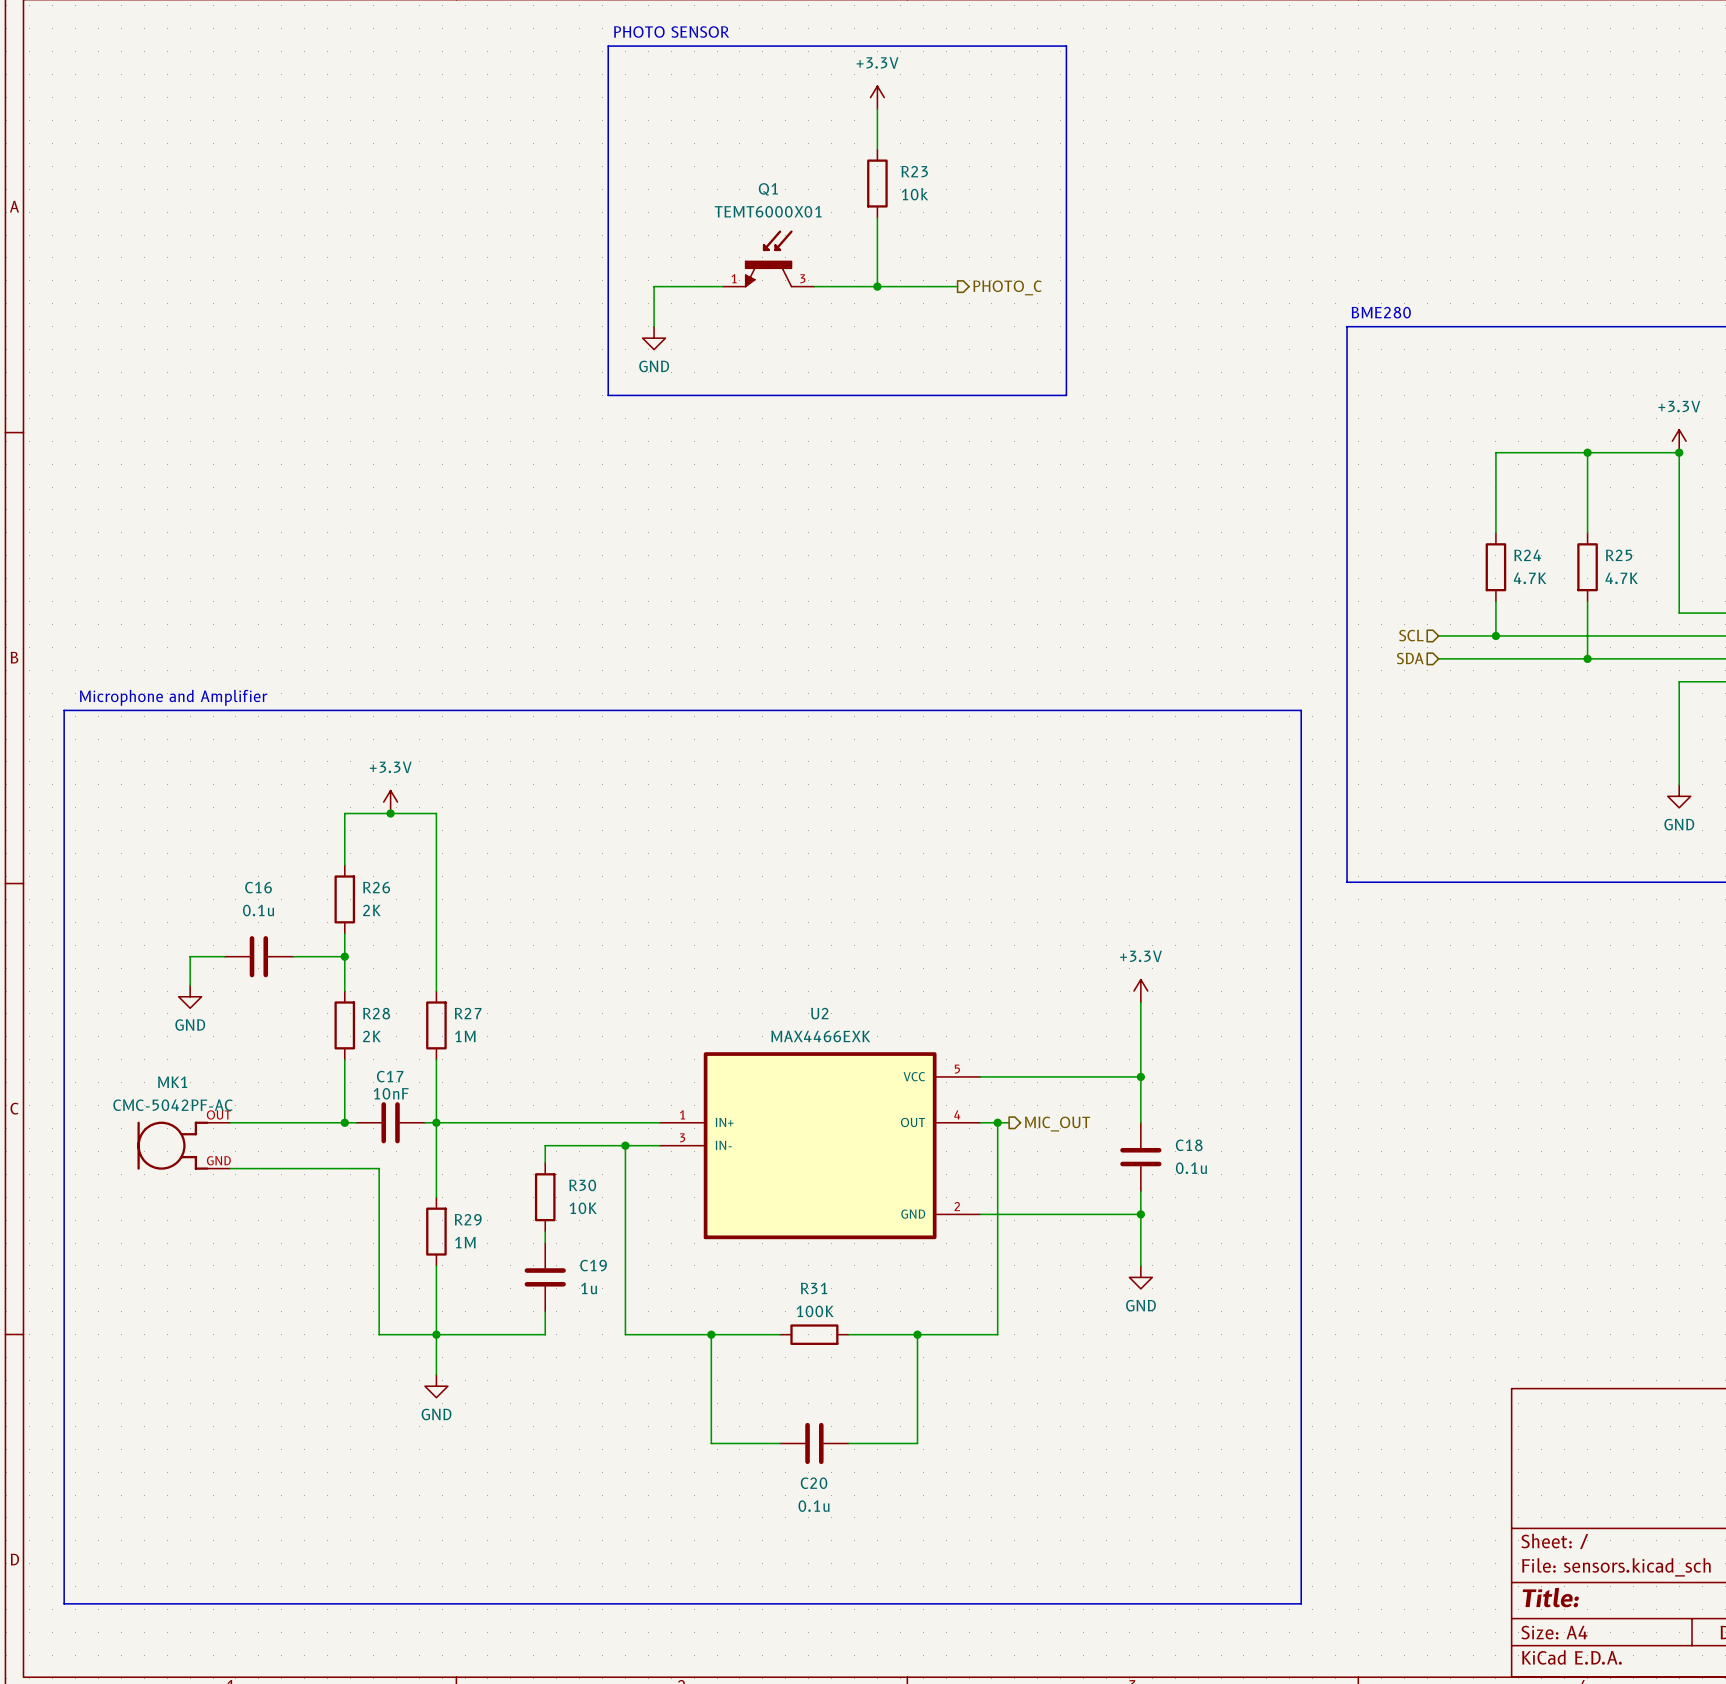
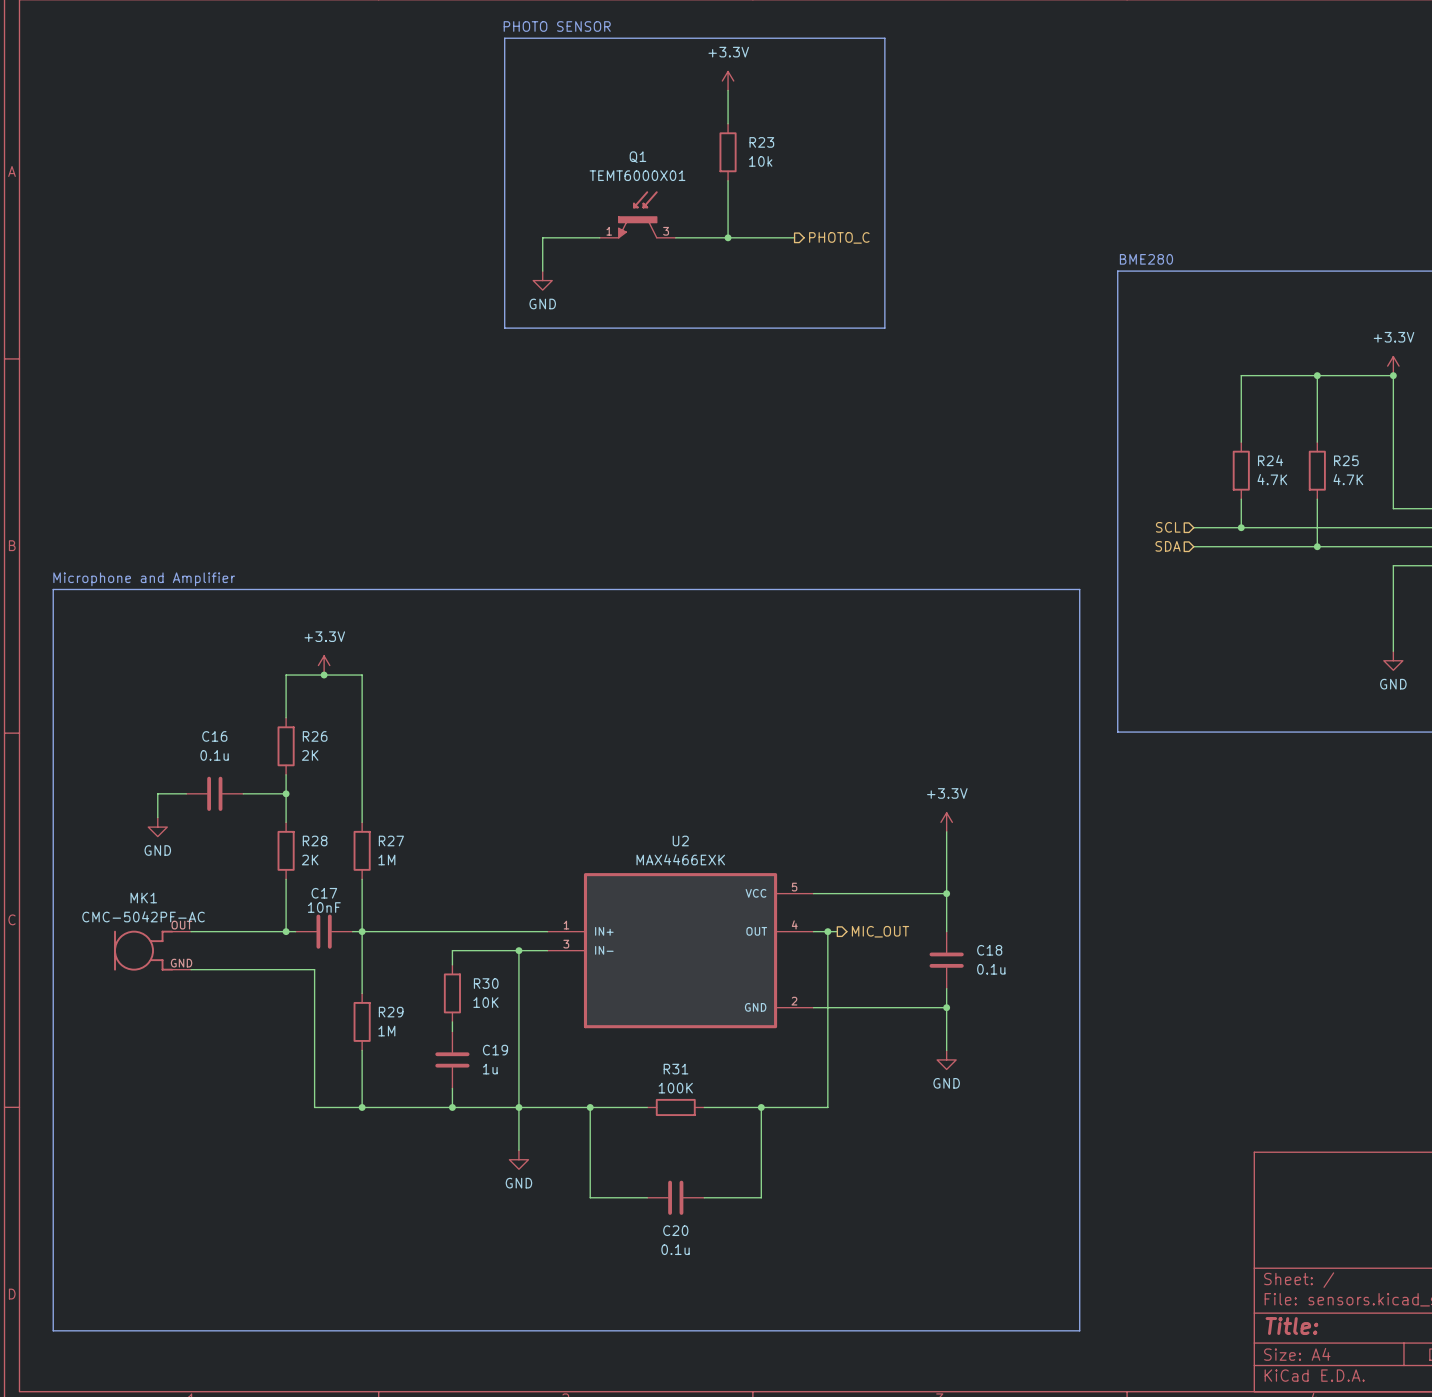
wire: (436, 1334) (436, 1374) -> none
wire: none -> (452, 1107) (518, 1107) (518, 1150)
junction: none -> (452, 1107)
junction: none -> (518, 1107)
power symbol position: GND (436, 1386) -> GND (518, 1159)

